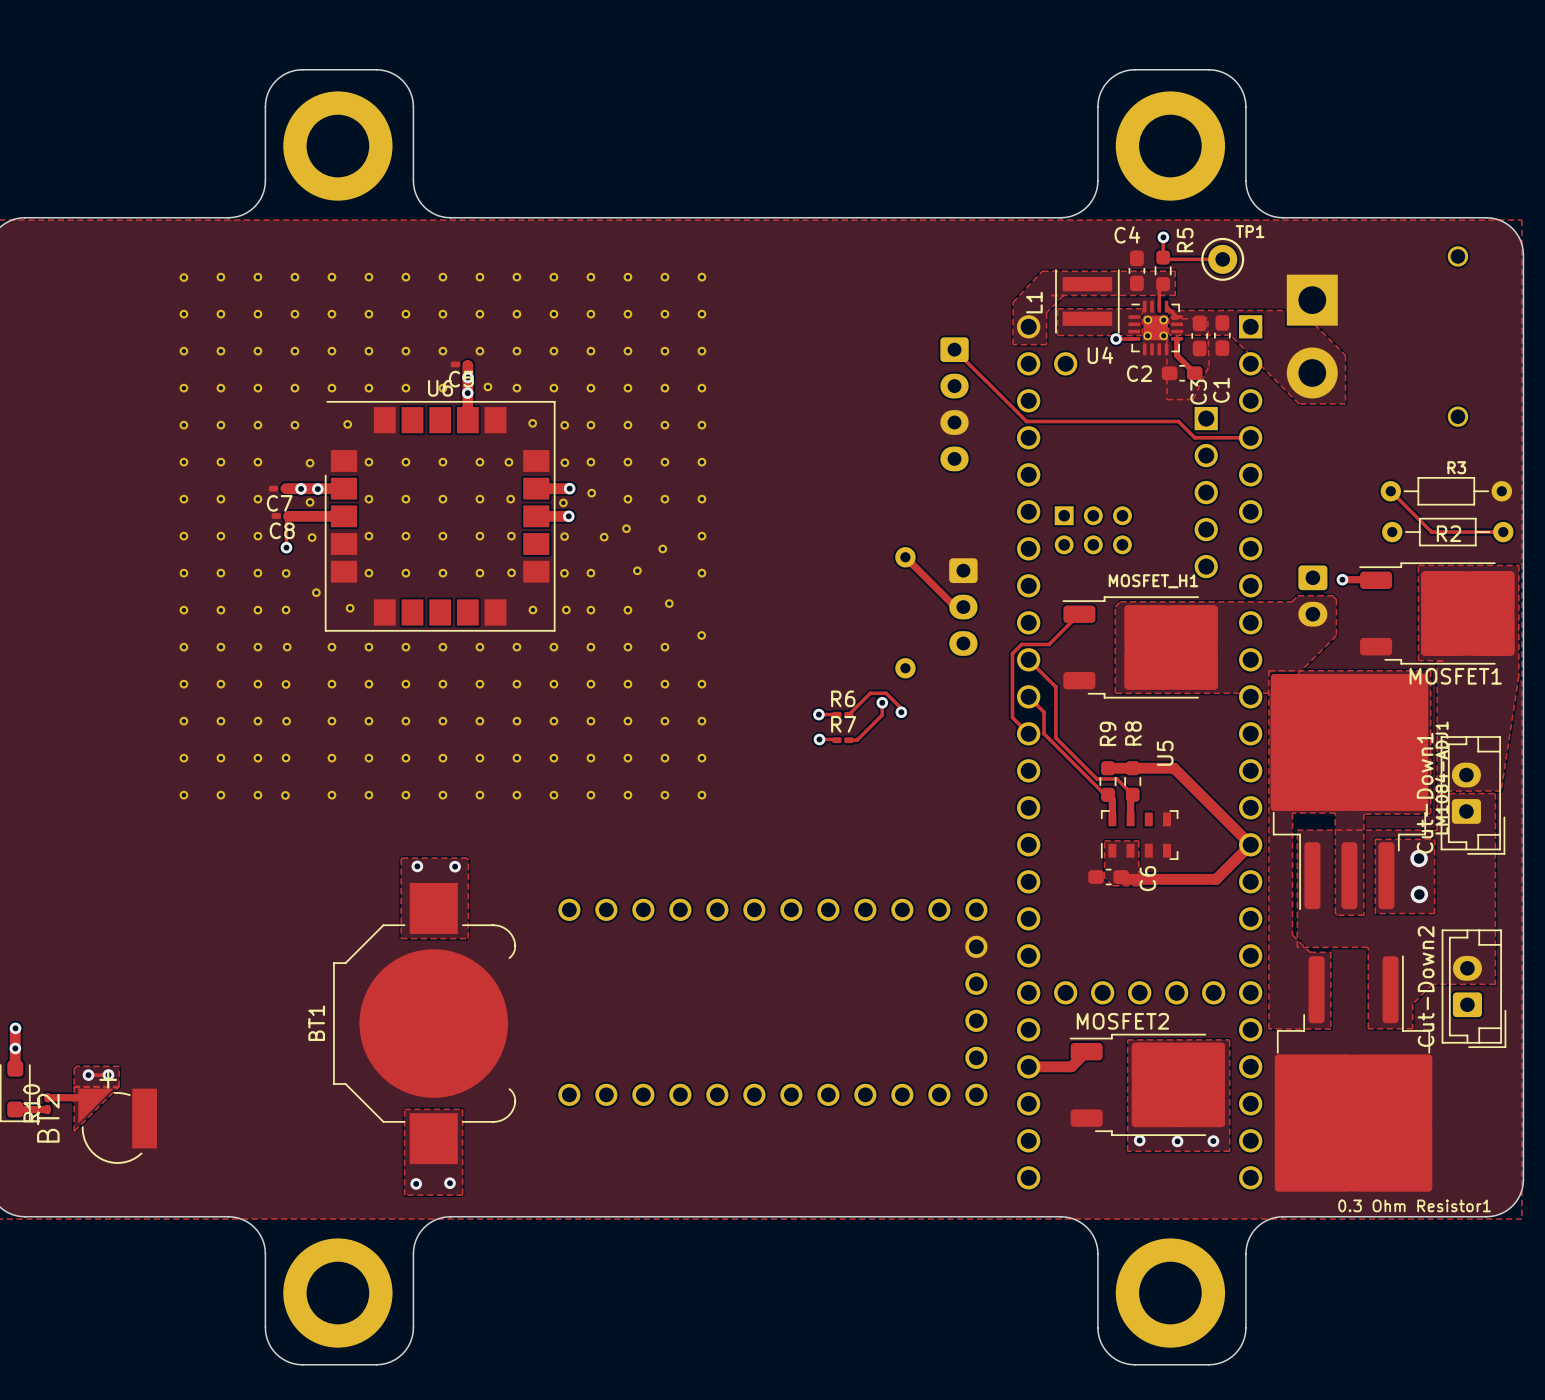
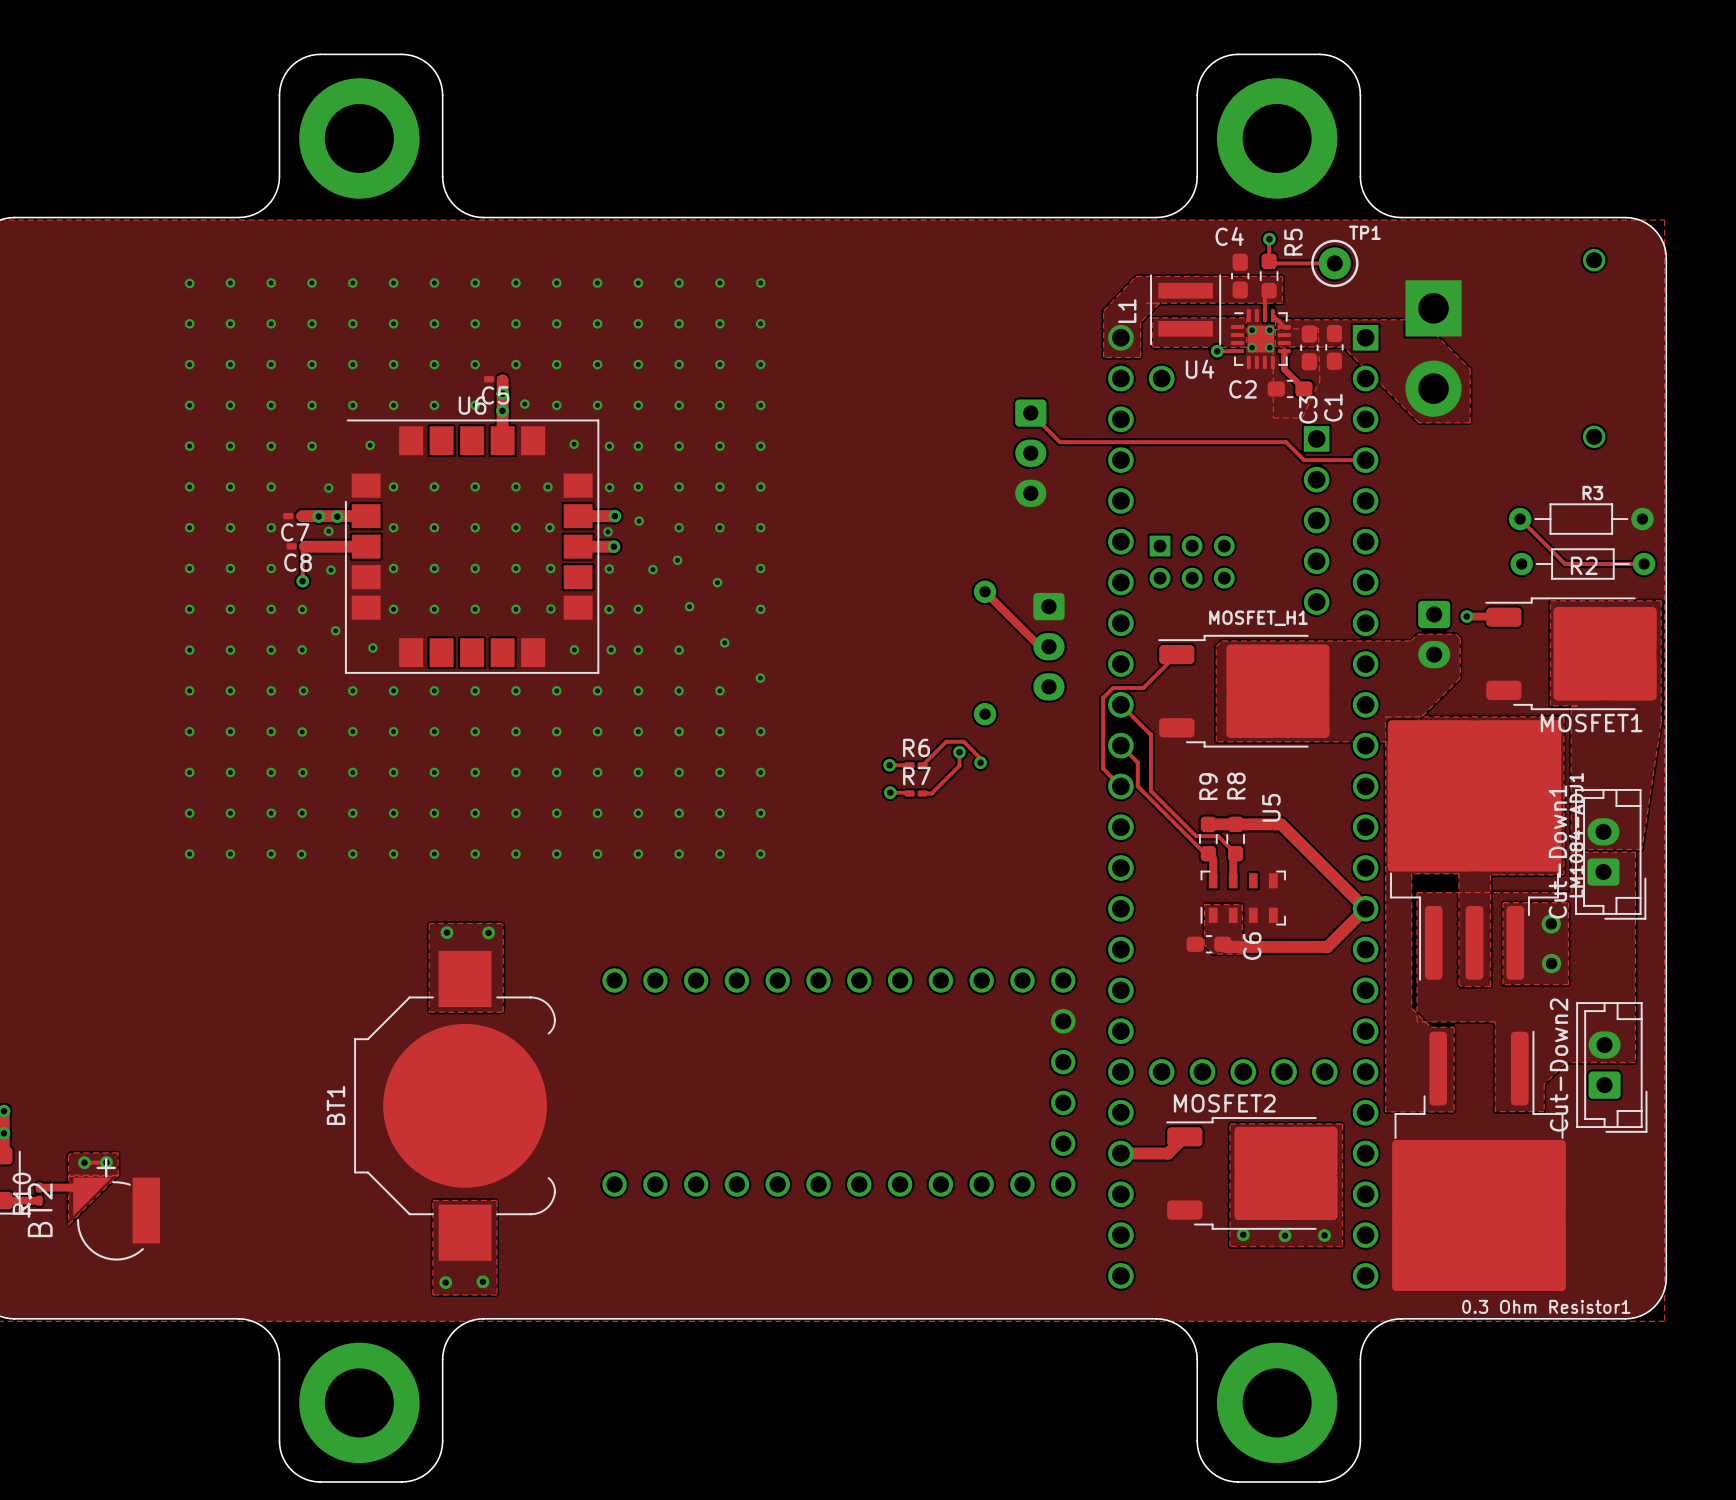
track: (954, 349) (985, 380) -> none
track: (985, 380) (1026, 421) -> (1030, 413) (1059, 442) (1118, 442)
part: (954, 404) -> none
part: none -> (1030, 453)

